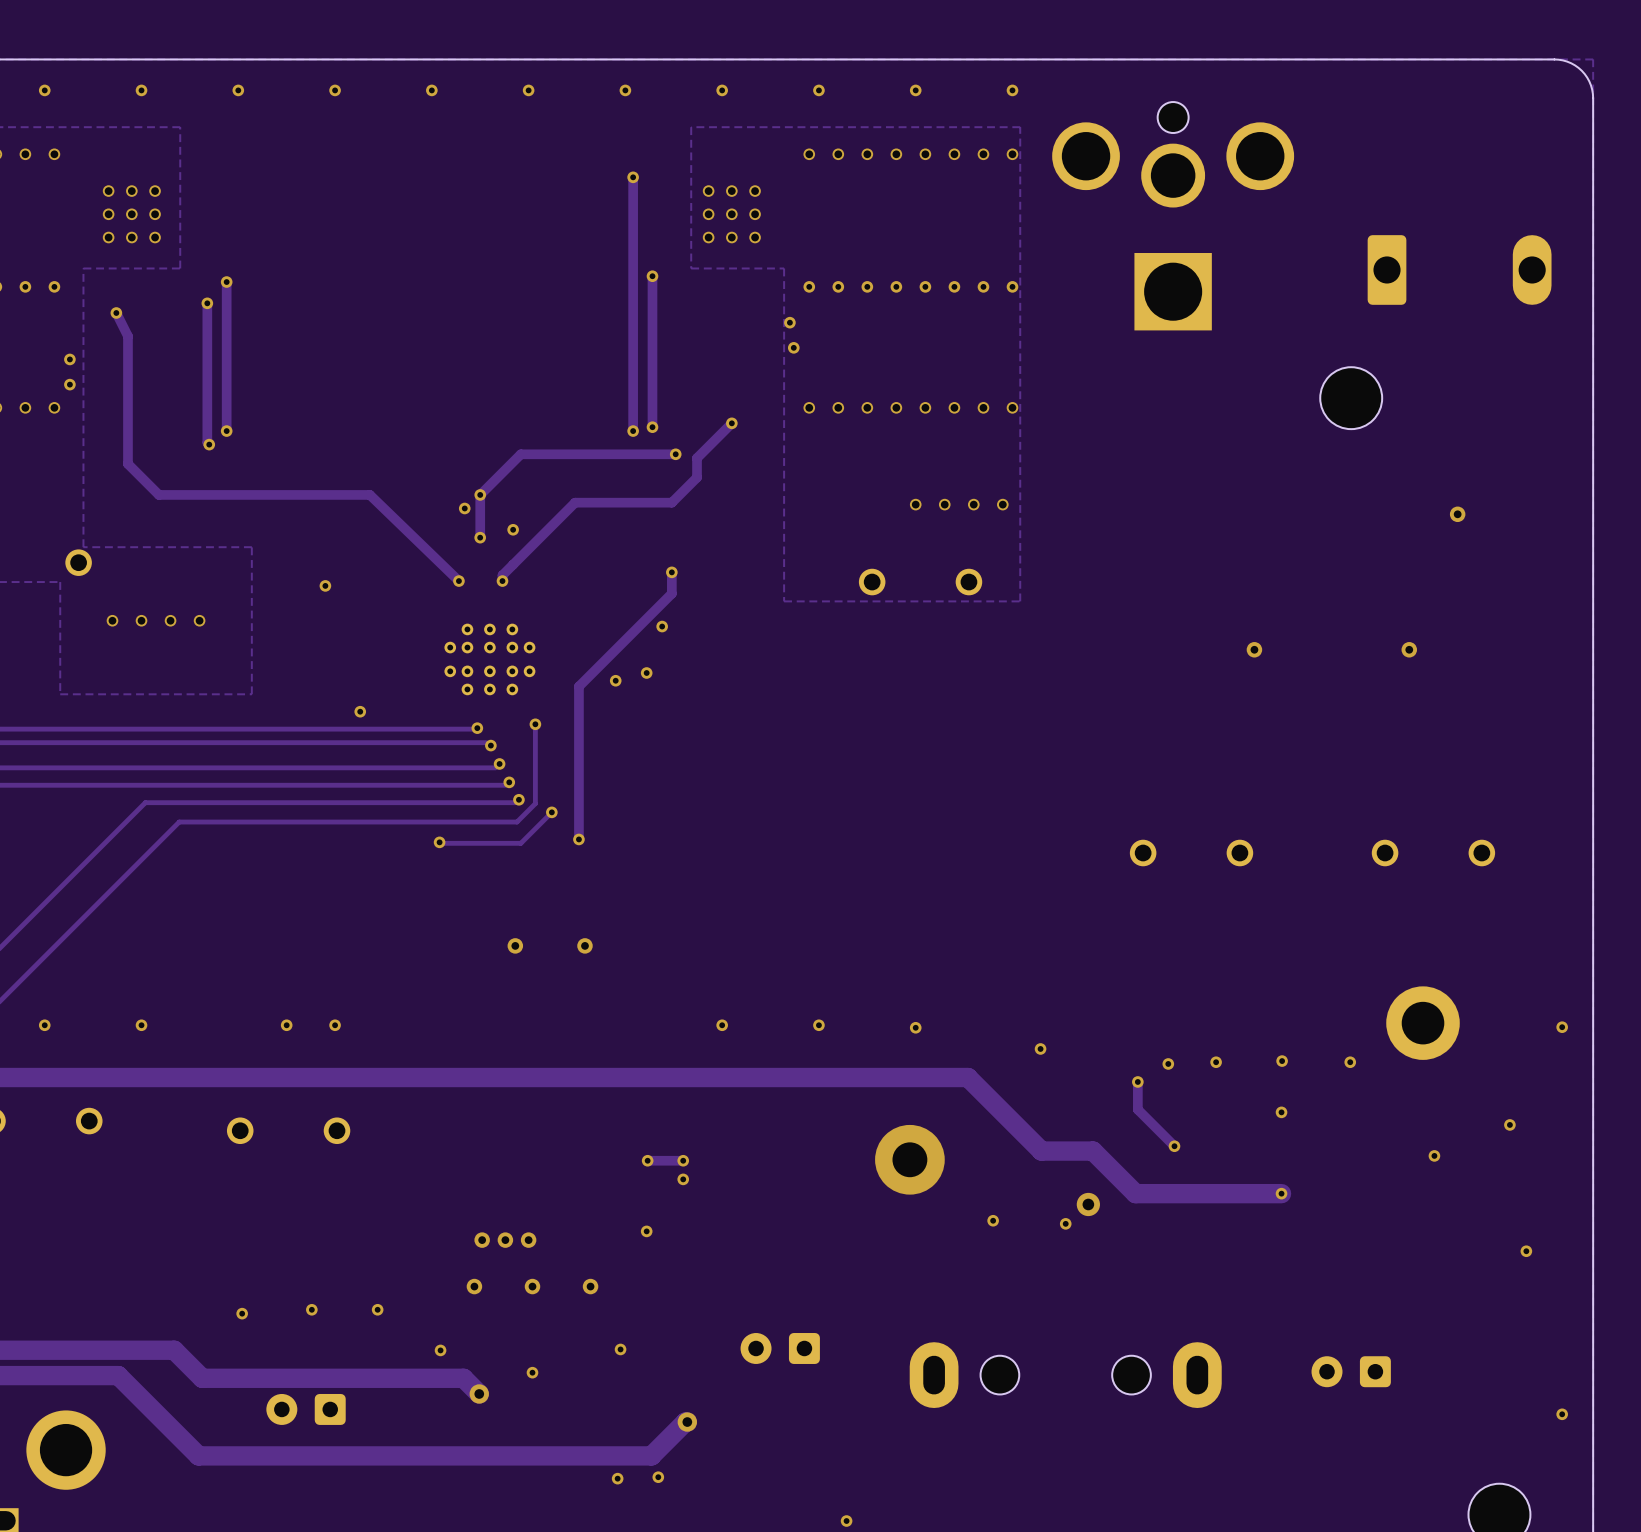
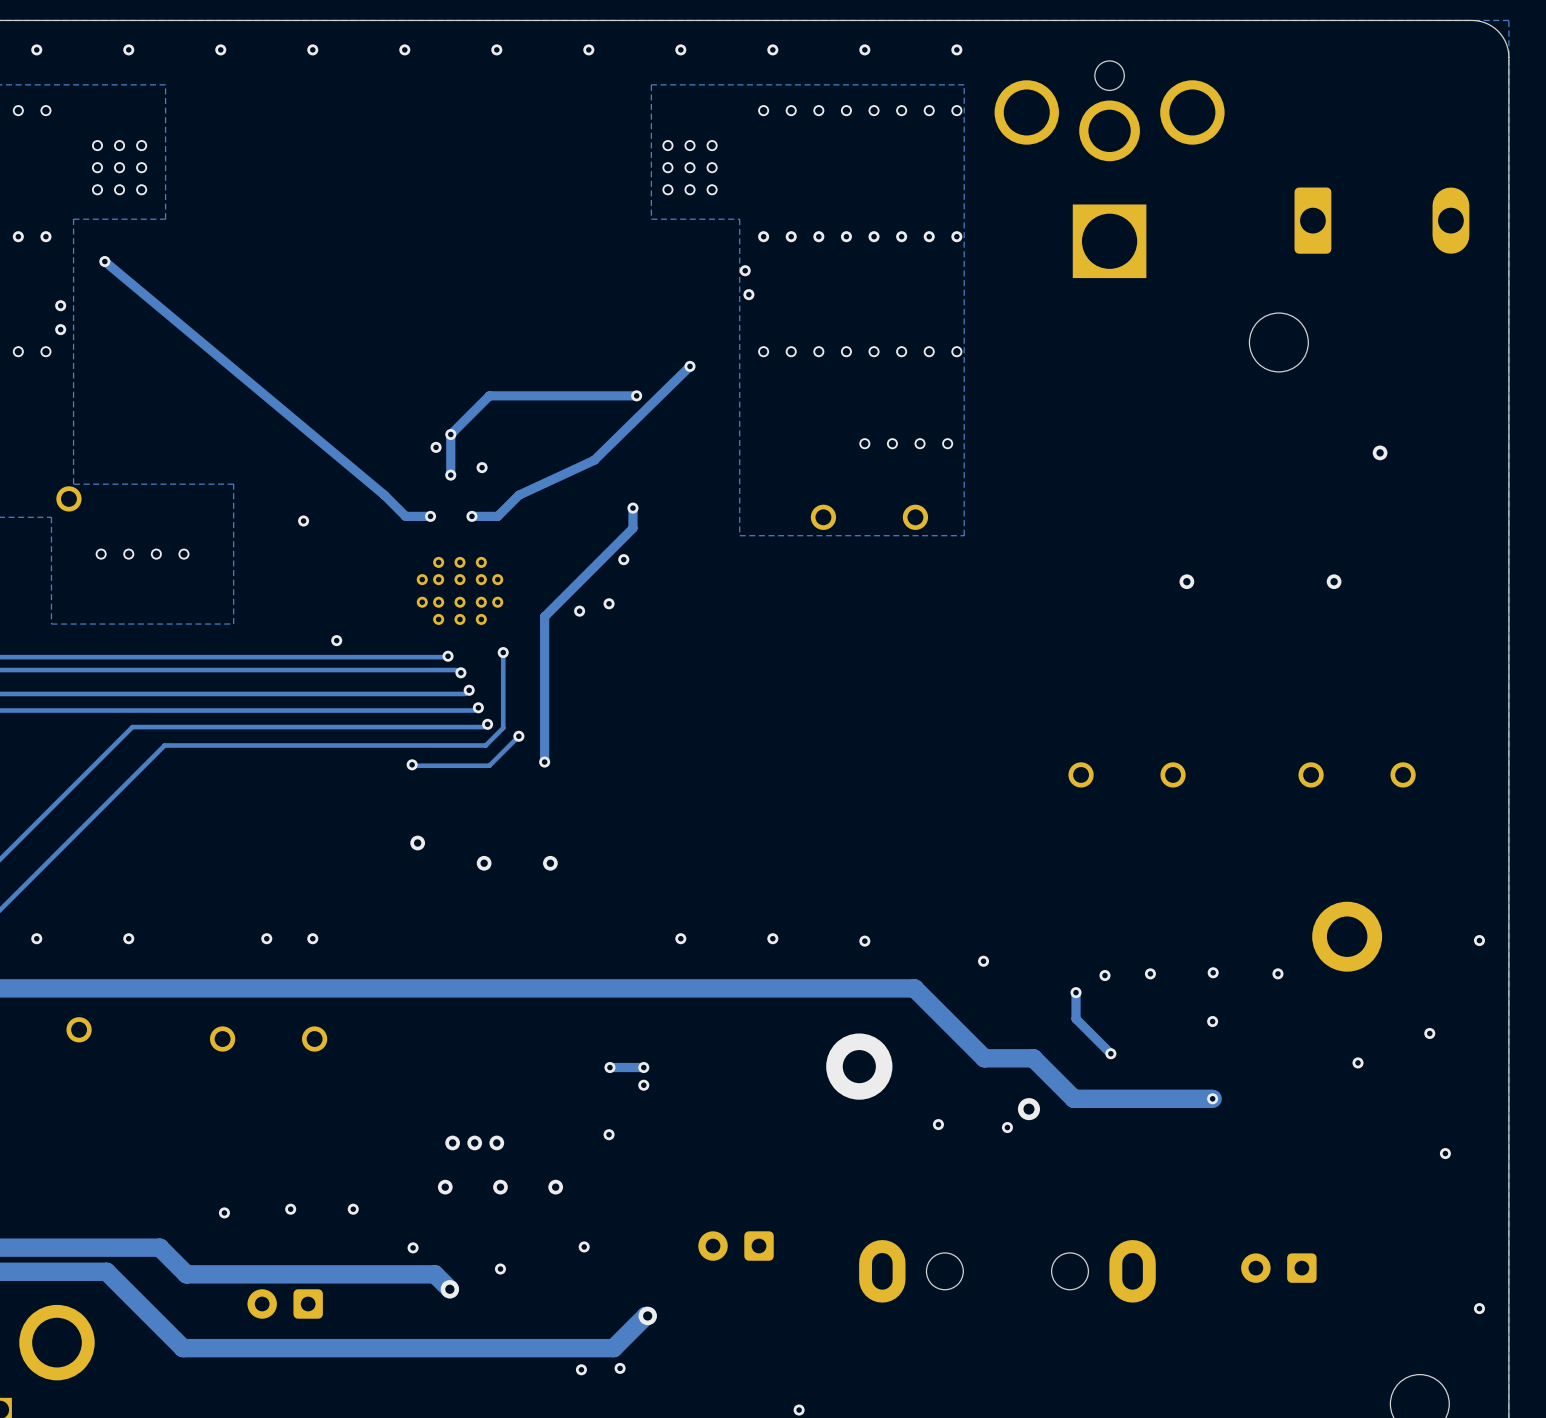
track: (633, 177) (633, 431) -> none
via: (633, 177) -> none
track: (652, 276) (652, 427) -> none
via: (652, 276) -> none
track: (226, 282) (226, 431) -> none
via: (226, 282) -> none
track: (207, 303) (207, 442) (209, 444) -> none
via: (207, 303) -> none
track: (116, 313) (127, 336) (127, 463) (158, 494) (369, 494) (458, 581) -> (104, 261) (384, 495) (405, 516) (430, 516)
track: (731, 423) (697, 458) (697, 477) (671, 502) (575, 502) (502, 575) (502, 581) -> (690, 366) (594, 460) (518, 495) (497, 516) (471, 516)
via: (652, 427) -> none
via: (226, 431) -> none
via: (633, 431) -> none
via: (209, 444) -> none
via: none -> (417, 843)

